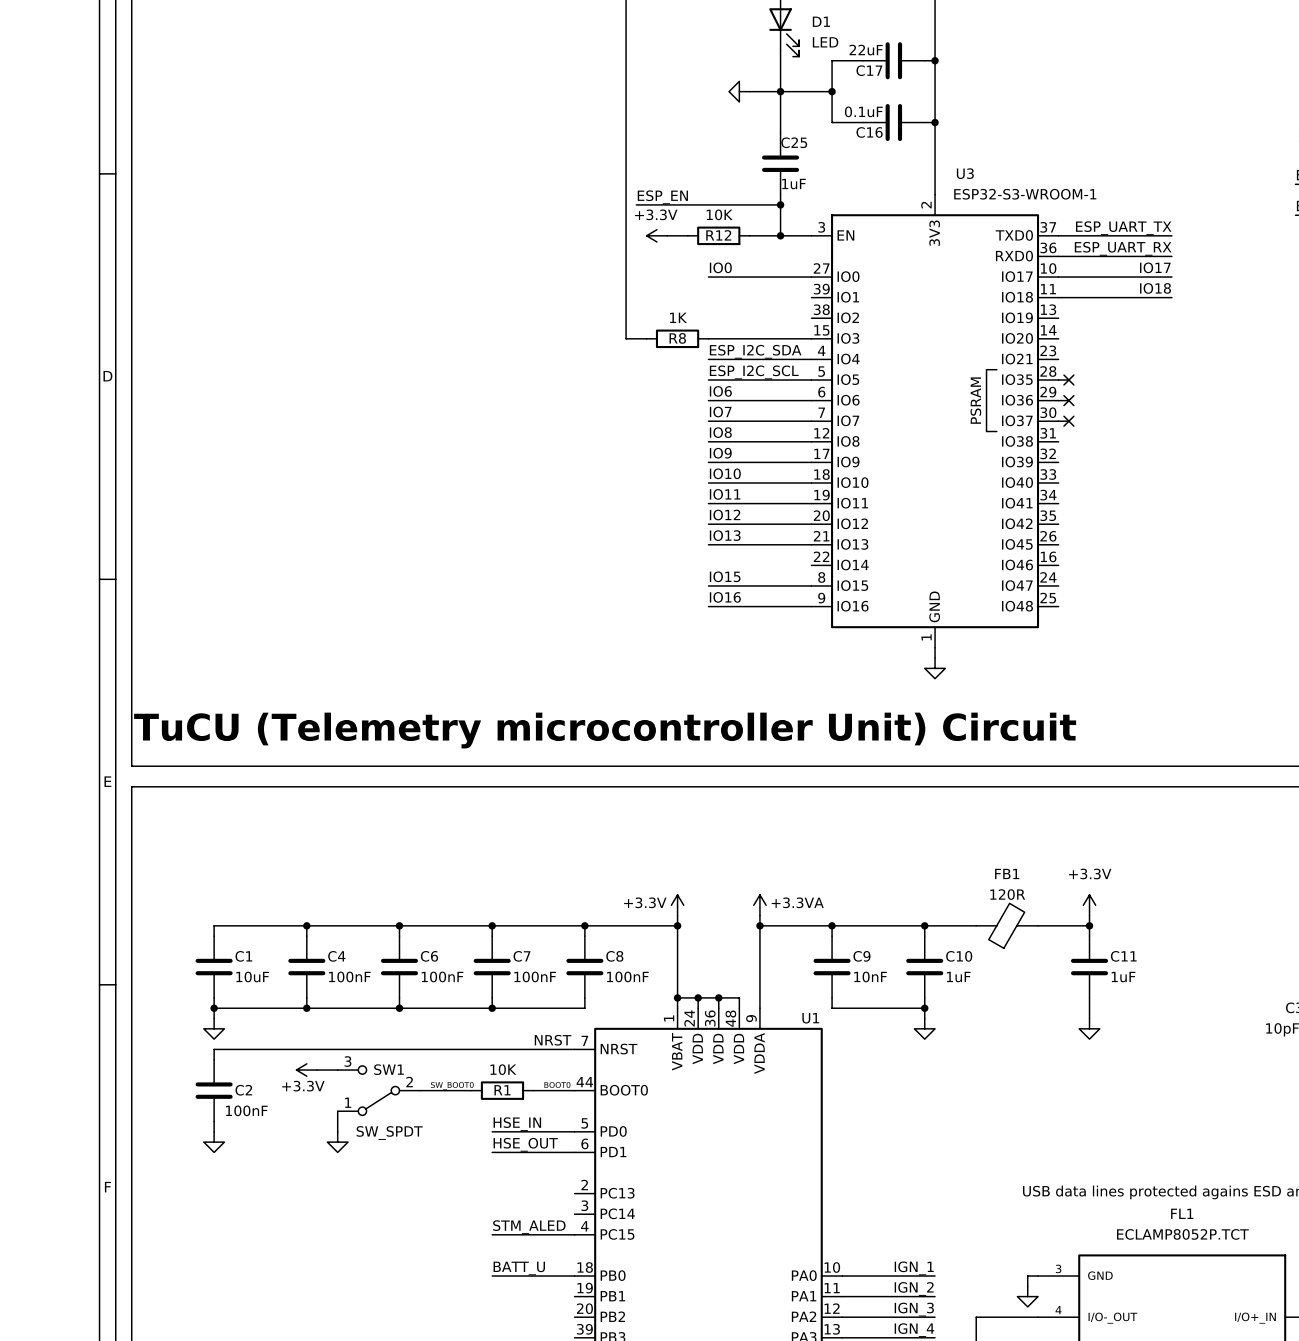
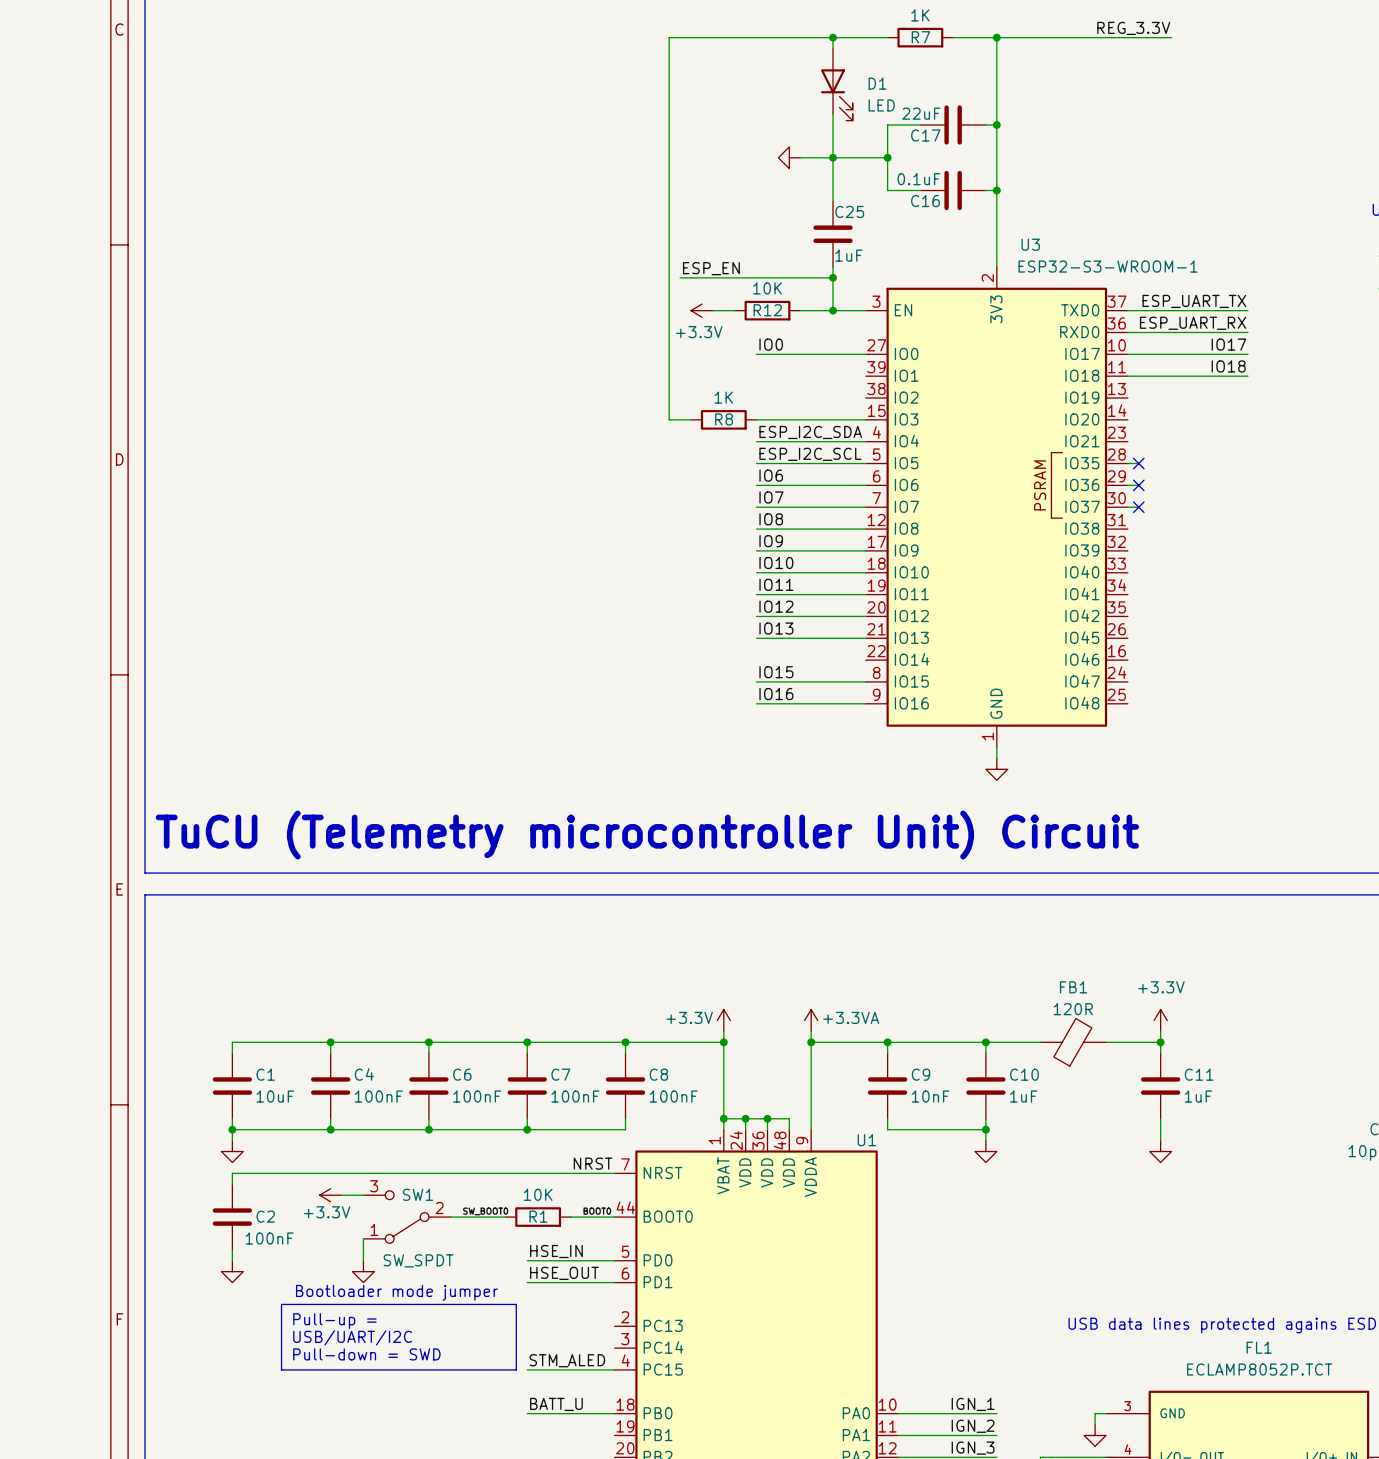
power symbol text position: +3.3V (656, 214) -> +3.3V (699, 332)
text: none -> Bootloader mode jumper (396, 1292)
line: none -> (281, 1304) (516, 1304) (516, 1369) (281, 1369) (281, 1304)
text: none -> Pull-up = (334, 1321)
text: none -> USB/UART/I2C (352, 1337)
text: none -> Pull-down = SWD (366, 1354)

